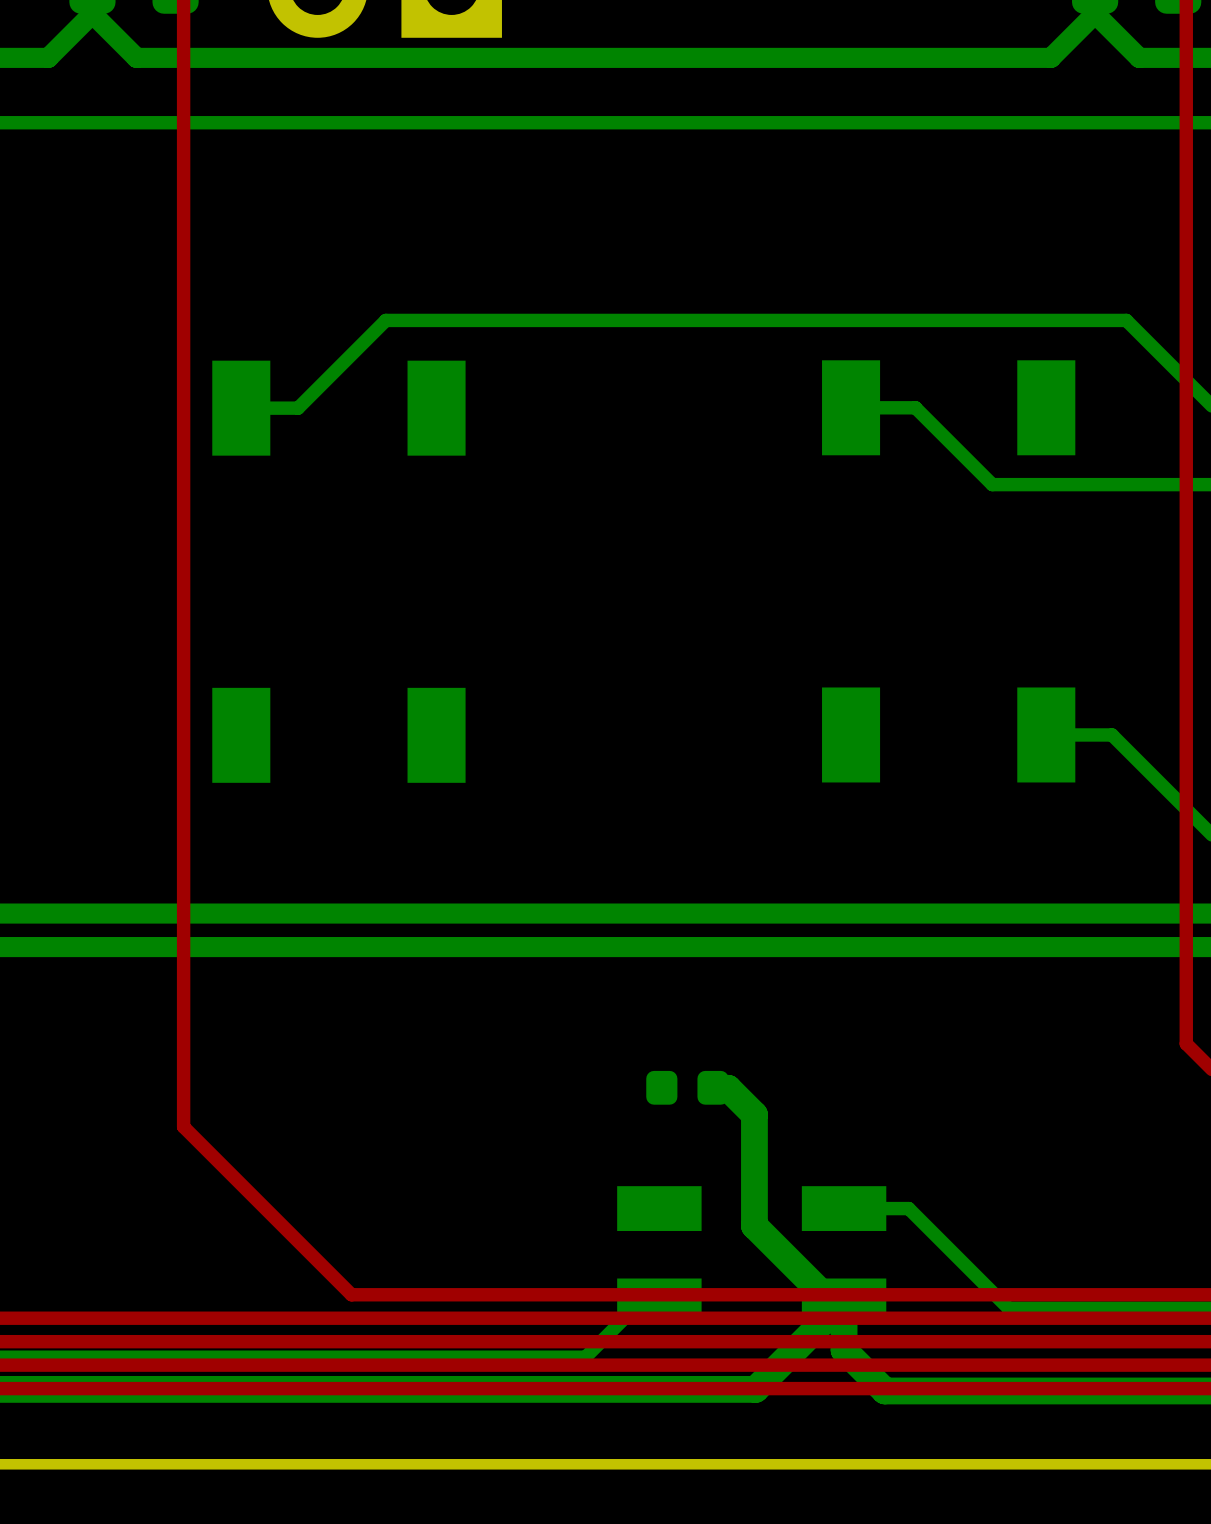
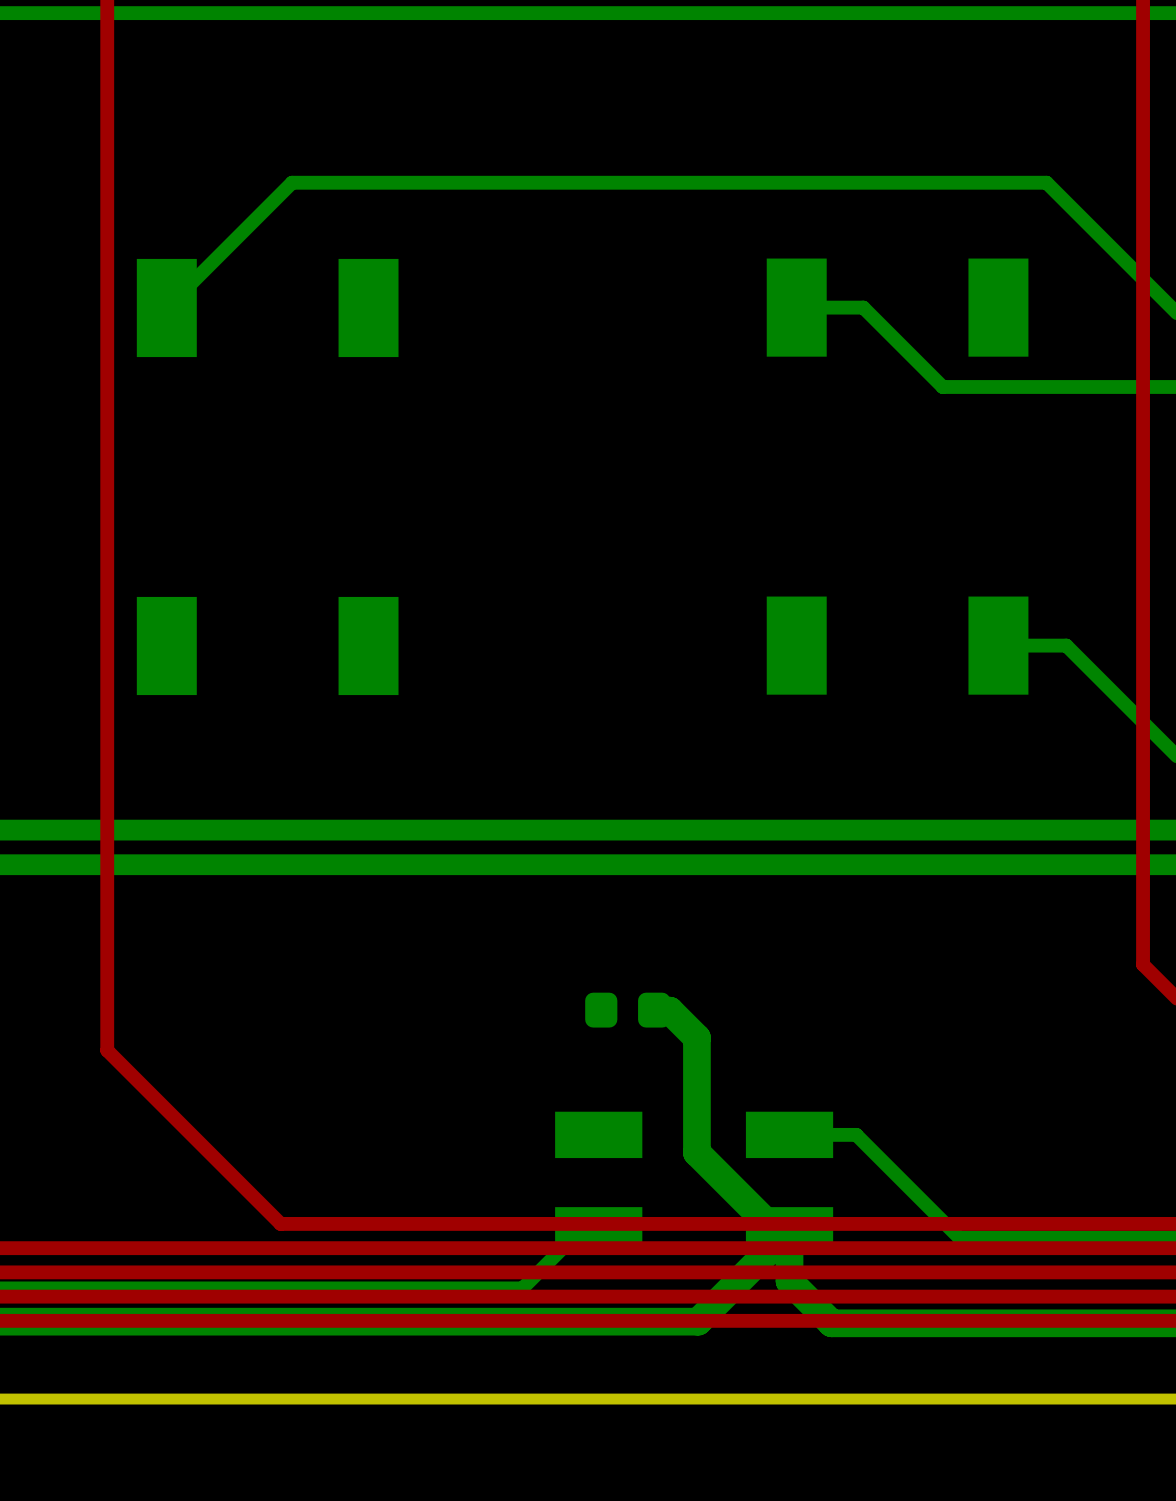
bottom track: (1126, 320) (385, 320) (298, 408) (241, 408) -> (1081, 217) (1046, 182) (292, 182) (166, 307)

